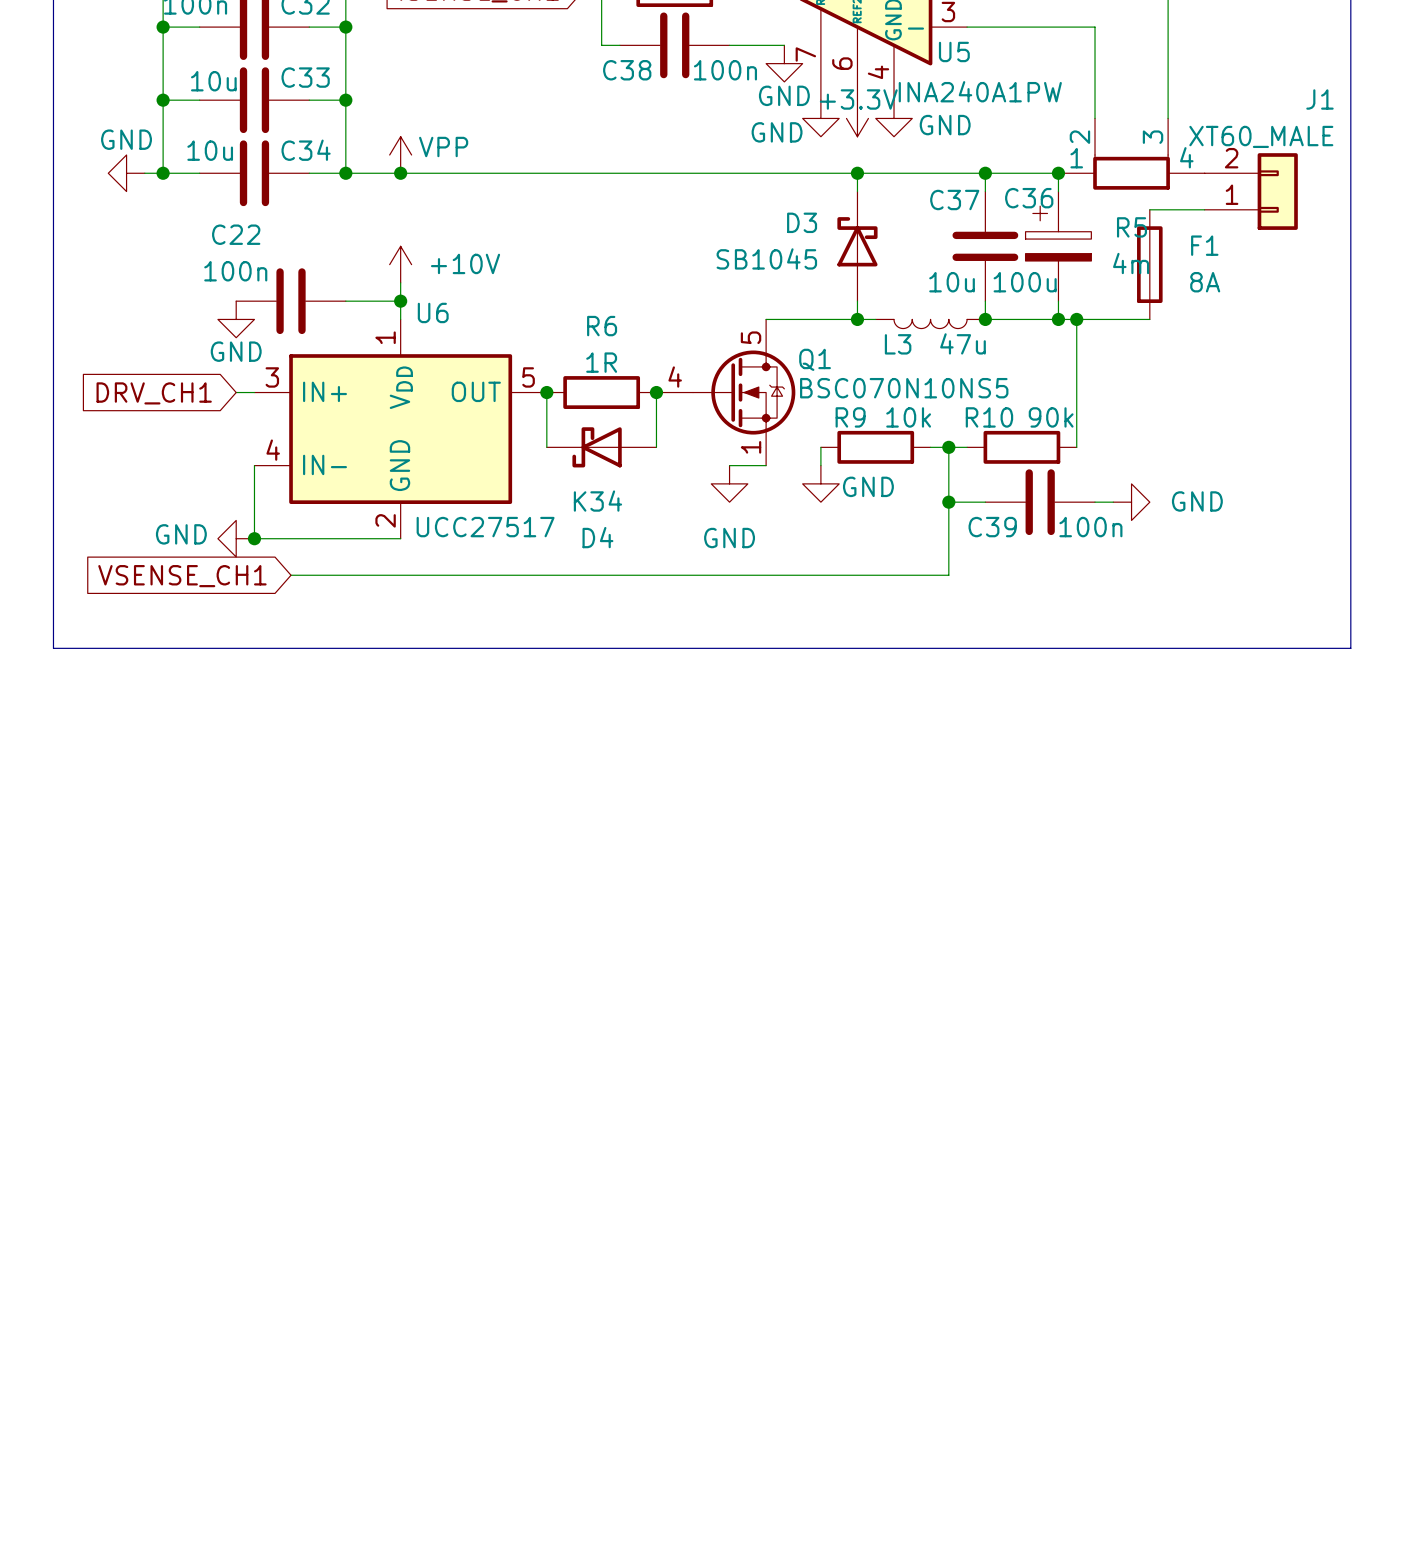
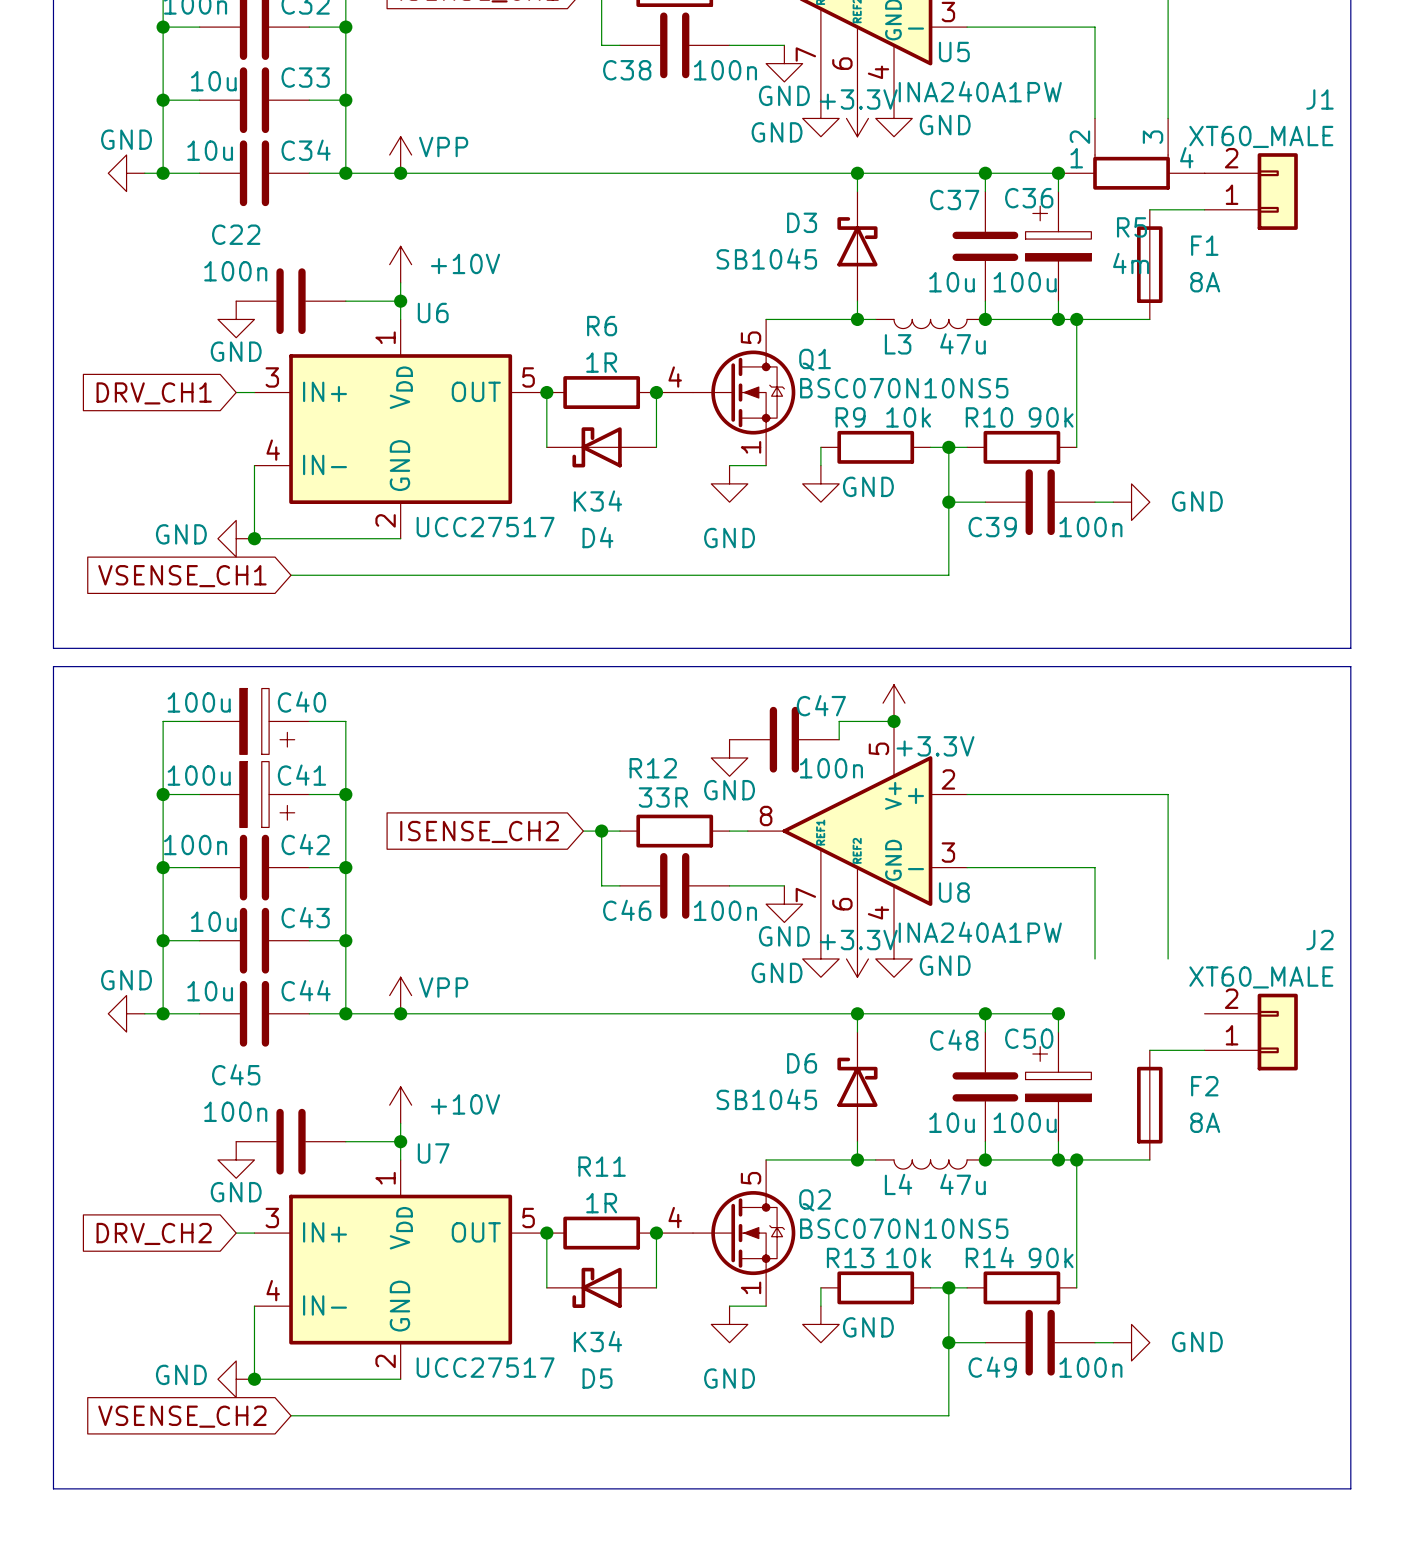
line: none -> (53, 666) (1350, 666) (1350, 1488) (53, 1488) (53, 666)
power symbol: none -> +3.3V (894, 703)
wire: none -> (199, 721) (163, 721) (163, 1013)
C40: none -> 100u (254, 721)
wire: none -> (309, 721) (345, 721) (345, 1013)
wire: none -> (894, 721) (839, 721) (839, 739)
junction: none -> (894, 721)
C47: none -> 100n (784, 739)
power symbol: none -> GND (729, 757)
wire: none -> (163, 794) (199, 794)
junction: none -> (163, 794)
C41: none -> 100u (254, 794)
wire: none -> (309, 794) (345, 794)
junction: none -> (345, 794)
wire: none -> (967, 794) (1168, 794) (1168, 958)
global label: none -> ISENSE_CH2 (479, 831)
wire: none -> (583, 831) (619, 831)
wire: none -> (601, 831) (601, 885) (619, 885)
junction: none -> (601, 831)
R12: none -> 33R (674, 831)
wire: none -> (729, 831) (747, 831)
U8: none -> INA240A1PW (857, 831)
wire: none -> (163, 867) (199, 867)
junction: none -> (163, 867)
C42: none -> 100n (254, 867)
wire: none -> (309, 867) (345, 867)
junction: none -> (345, 867)
wire: none -> (967, 867) (1095, 867) (1095, 958)
C46: none -> 100n (674, 885)
wire: none -> (729, 885) (784, 885)
power symbol: none -> GND (784, 904)
wire: none -> (163, 940) (199, 940)
junction: none -> (163, 940)
C43: none -> 10u (254, 940)
wire: none -> (309, 940) (345, 940)
junction: none -> (345, 940)
power symbol: none -> GND (820, 958)
power symbol: none -> +3.3V (857, 958)
power symbol: none -> GND (894, 958)
power symbol: none -> VPP (400, 995)
power symbol: none -> GND (126, 1013)
wire: none -> (144, 1013) (199, 1013)
junction: none -> (163, 1013)
C44: none -> 10u (254, 1013)
wire: none -> (309, 1013) (1058, 1013) (1058, 1032)
junction: none -> (345, 1013)
junction: none -> (400, 1013)
wire: none -> (857, 1013) (857, 1032)
junction: none -> (857, 1013)
wire: none -> (985, 1013) (985, 1032)
junction: none -> (985, 1013)
junction: none -> (1058, 1013)
J2: none -> XT60_MALE (1251, 1032)
wire: none -> (1149, 1050) (1204, 1050)
D6: none -> SB1045 (857, 1086)
C48: none -> 10u (985, 1086)
C50: none -> 100u (1058, 1086)
power symbol: none -> +10V (400, 1105)
F2: none -> 8A (1149, 1105)
wire: none -> (400, 1123) (400, 1159)
C45: none -> 100n (291, 1141)
wire: none -> (345, 1141) (400, 1141)
junction: none -> (400, 1141)
wire: none -> (857, 1141) (857, 1159)
wire: none -> (985, 1141) (985, 1159) (1149, 1159)
wire: none -> (1058, 1141) (1058, 1159)
power symbol: none -> GND (236, 1159)
wire: none -> (766, 1159) (875, 1159)
junction: none -> (857, 1159)
junction: none -> (985, 1159)
junction: none -> (1058, 1159)
wire: none -> (1076, 1159) (1076, 1287)
junction: none -> (1076, 1159)
L4: none -> 47u (930, 1164)
global label: none -> DRV_CH2 (154, 1233)
wire: none -> (236, 1233) (254, 1233)
wire: none -> (546, 1233) (546, 1287)
junction: none -> (546, 1233)
R11: none -> 1R (601, 1233)
wire: none -> (656, 1233) (656, 1287)
junction: none -> (656, 1233)
Q2: none -> BSC070N10NS5 (725, 1233)
U7: none -> UCC27517 (400, 1269)
D5: none -> K34 (601, 1287)
wire: none -> (820, 1287) (820, 1306)
R13: none -> 10k (875, 1287)
wire: none -> (930, 1287) (967, 1287)
wire: none -> (948, 1287) (948, 1415) (291, 1415)
junction: none -> (948, 1287)
R14: none -> 90k (1021, 1287)
wire: none -> (254, 1306) (254, 1379) (400, 1379)
wire: none -> (729, 1306) (766, 1306)
power symbol: none -> GND (729, 1324)
power symbol: none -> GND (820, 1324)
wire: none -> (948, 1342) (985, 1342)
junction: none -> (948, 1342)
C49: none -> 100n (1040, 1342)
wire: none -> (1095, 1342) (1113, 1342)
power symbol: none -> GND (1131, 1342)
power symbol: none -> GND (236, 1379)
junction: none -> (254, 1379)
global label: none -> VSENSE_CH2 (182, 1416)

